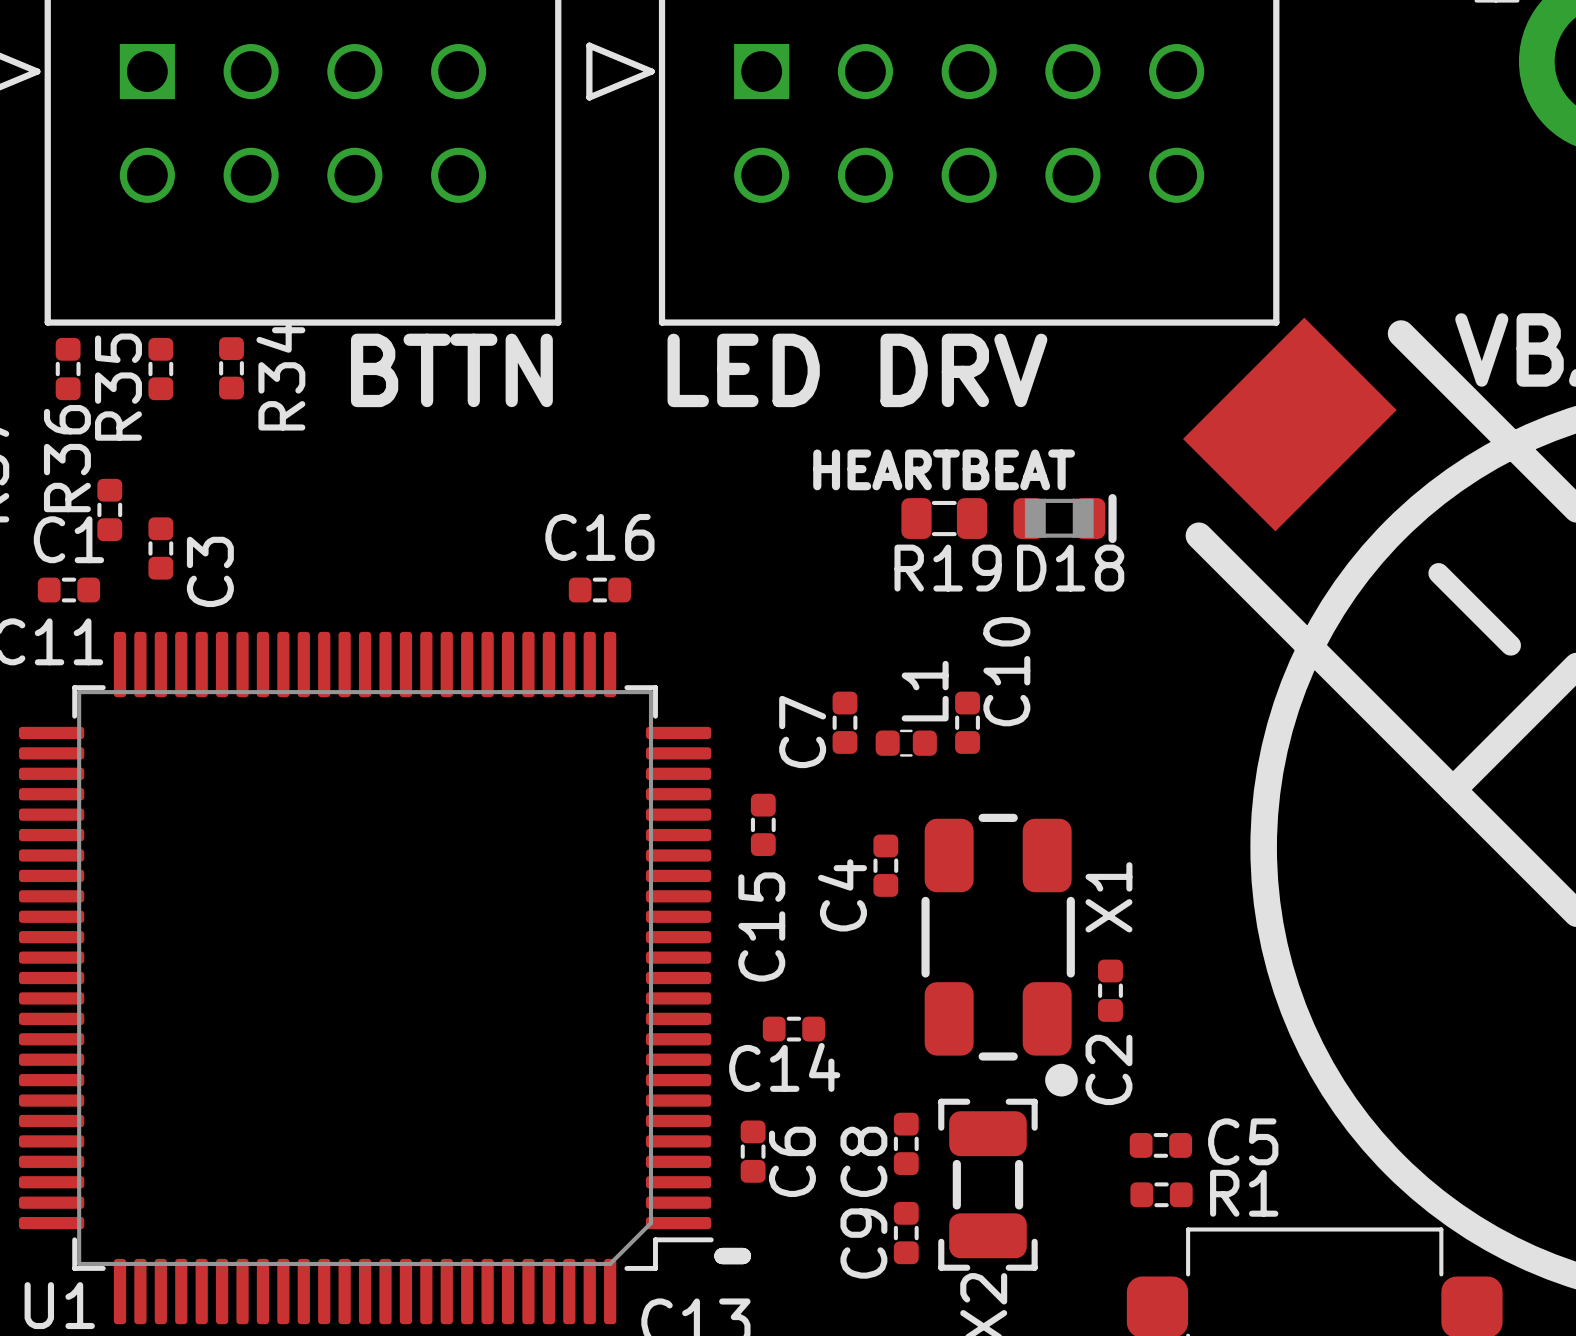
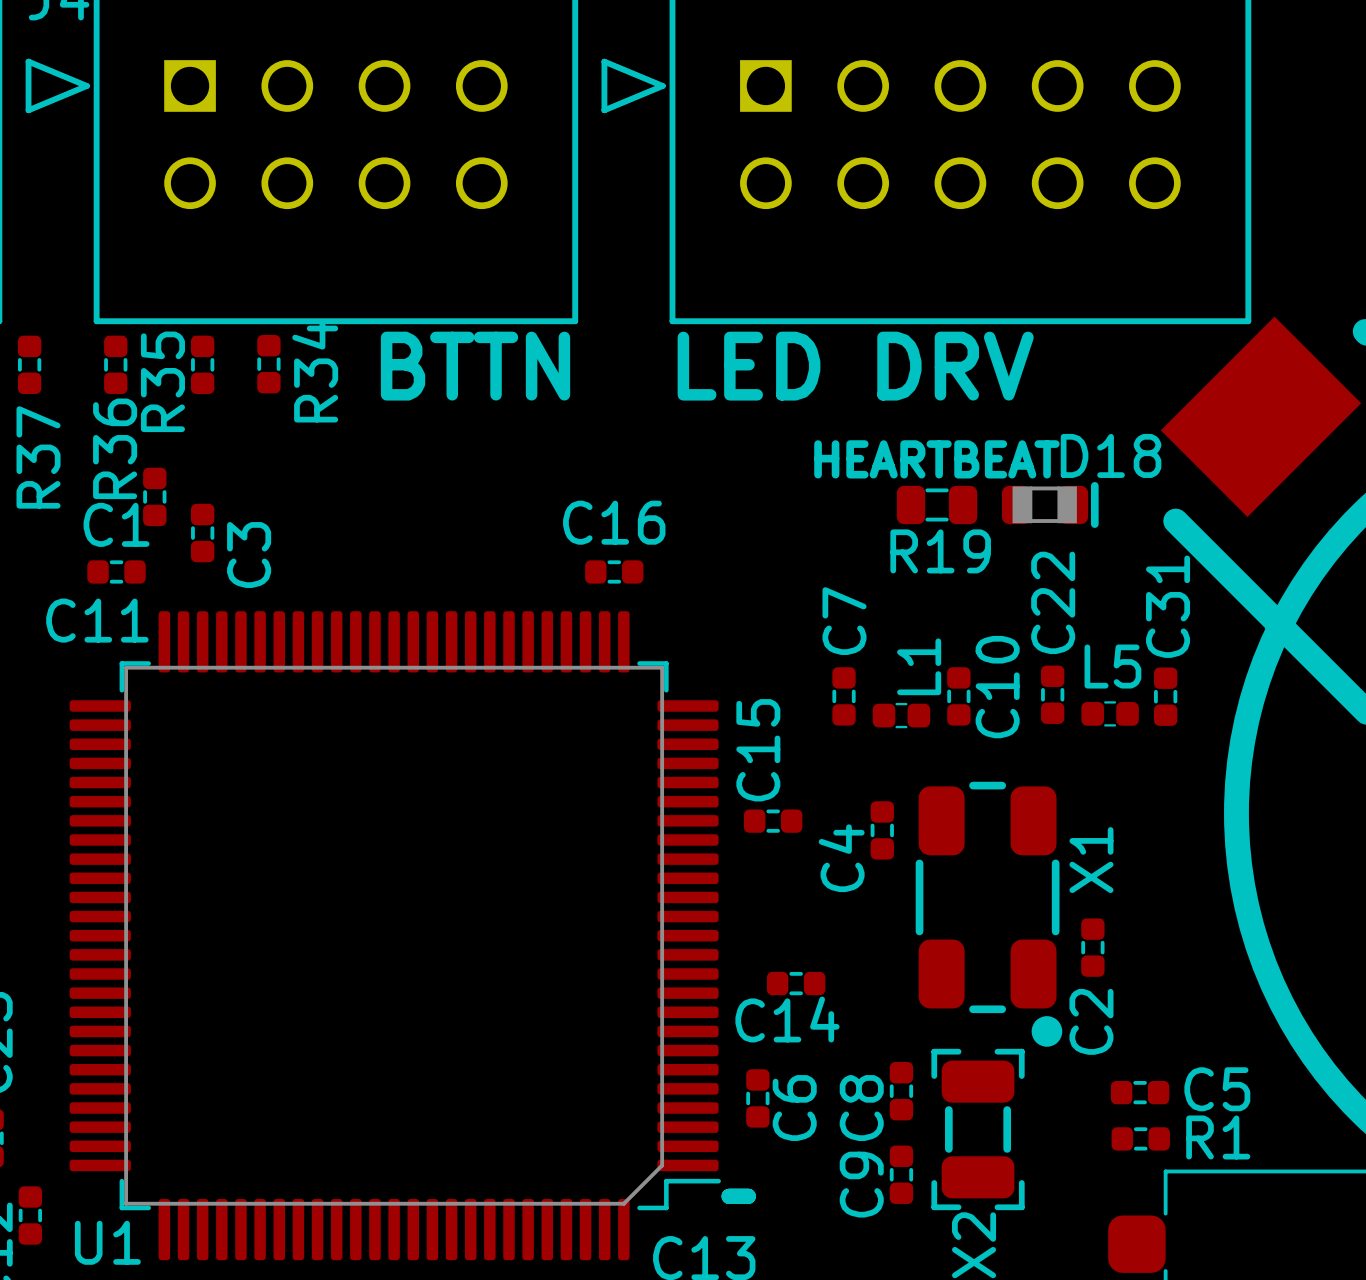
D18 name position: D18 (1070, 568) -> D18 (1111, 455)
C10 name position: C10 (1006, 671) -> C10 (997, 687)
C22: none -> (1052, 694)
C31: none -> (1165, 696)
C7 name position: C7 (802, 731) -> C7 (844, 621)
L5: none -> (1110, 713)
C15 rotation: 0° (763, 824) -> 90° clockwise (773, 821)
C15 name position: C15 (761, 926) -> C15 (758, 750)

